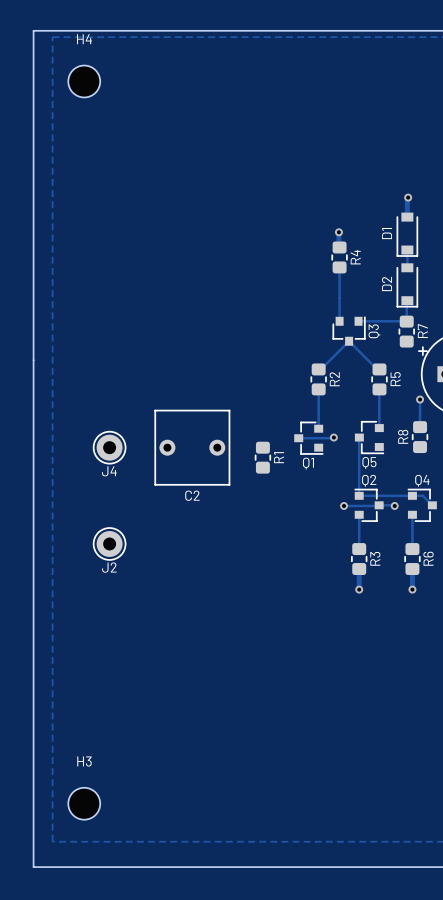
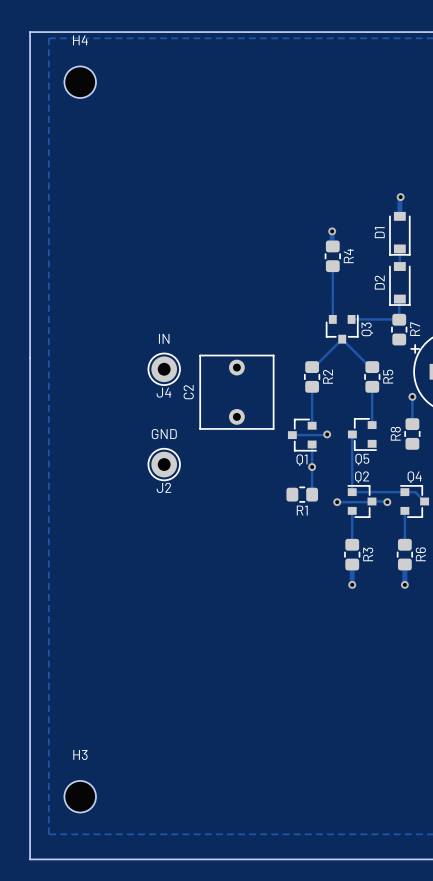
text: none -> IN (164, 338)
text: none -> GND (164, 434)
J4 position: (109, 447) -> (164, 369)
C2 rotation: 0° (192, 447) -> 90° clockwise (236, 392)
C2 position: (192, 447) -> (236, 392)
track: none -> (312, 444) (312, 494)
R1 rotation: 0° (262, 457) -> 90° clockwise (302, 494)
R1 position: (262, 457) -> (302, 494)
via: none -> (312, 467)
J2 position: (109, 543) -> (164, 464)

